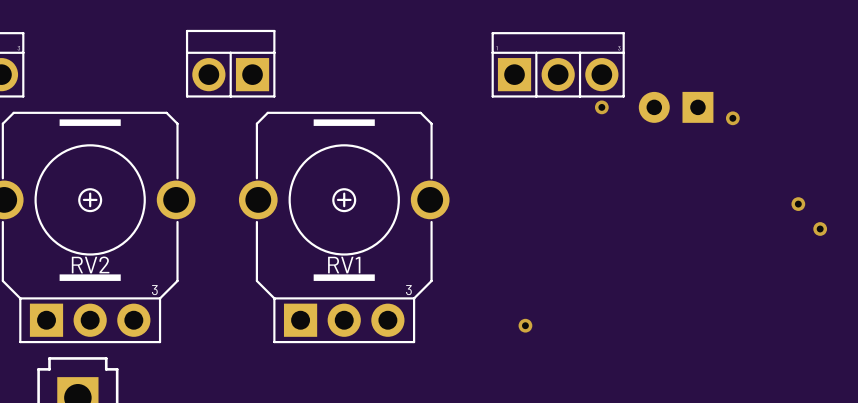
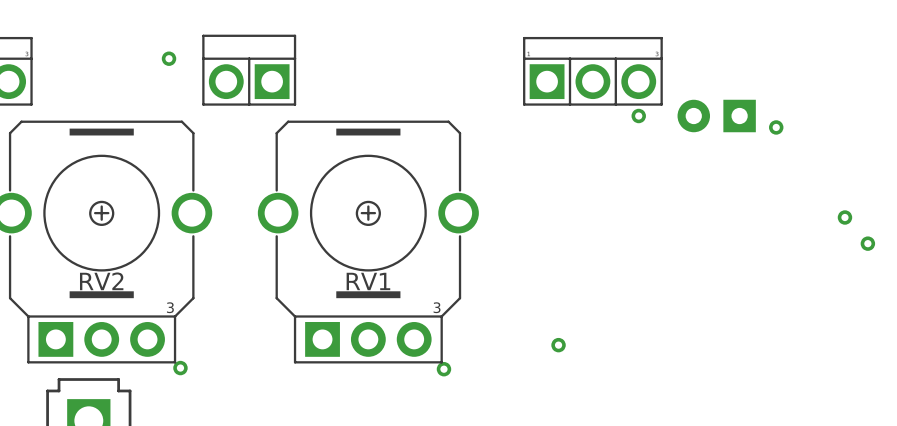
via: none -> (169, 58)
via: none -> (180, 368)
via: none -> (443, 369)

